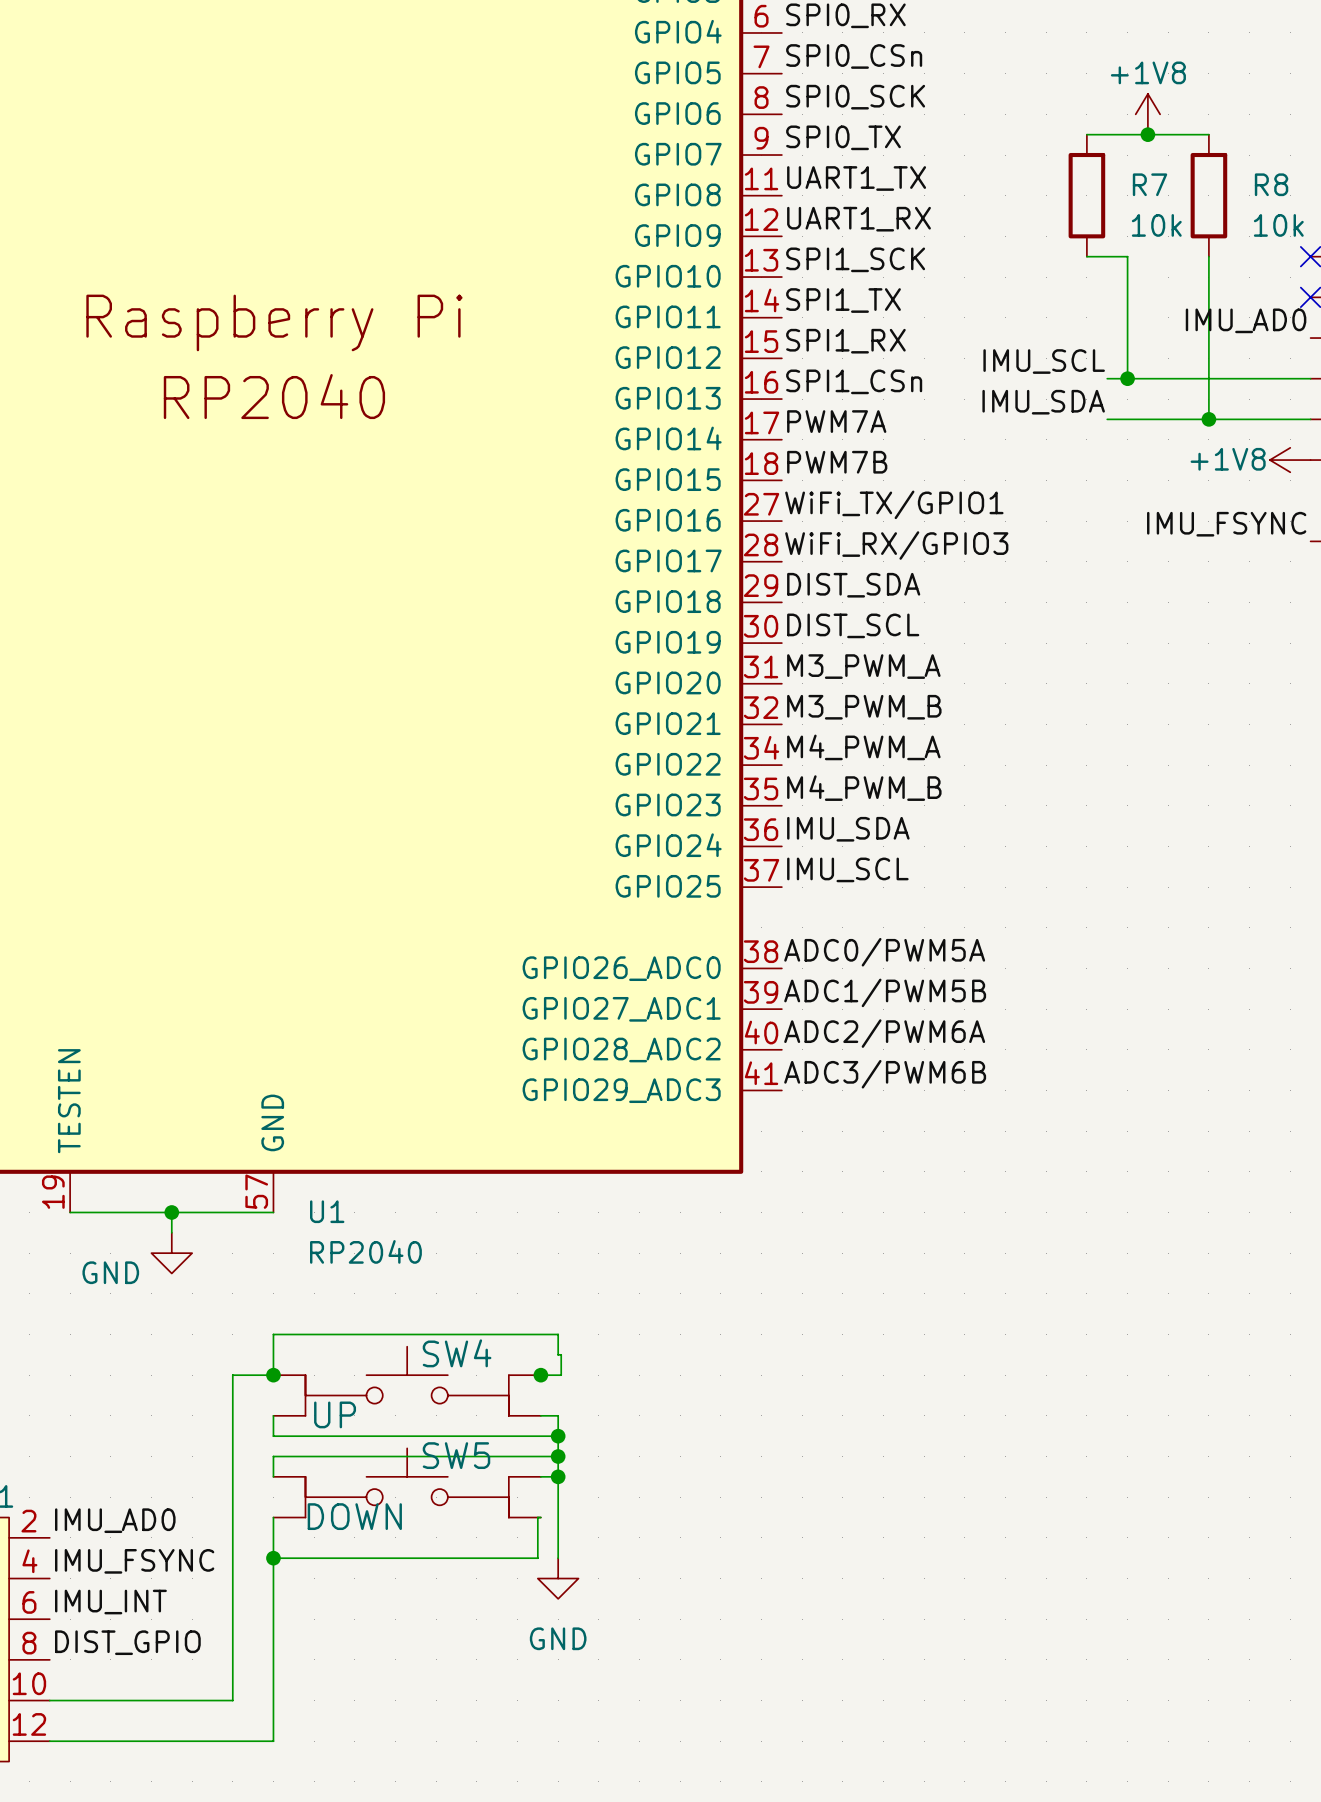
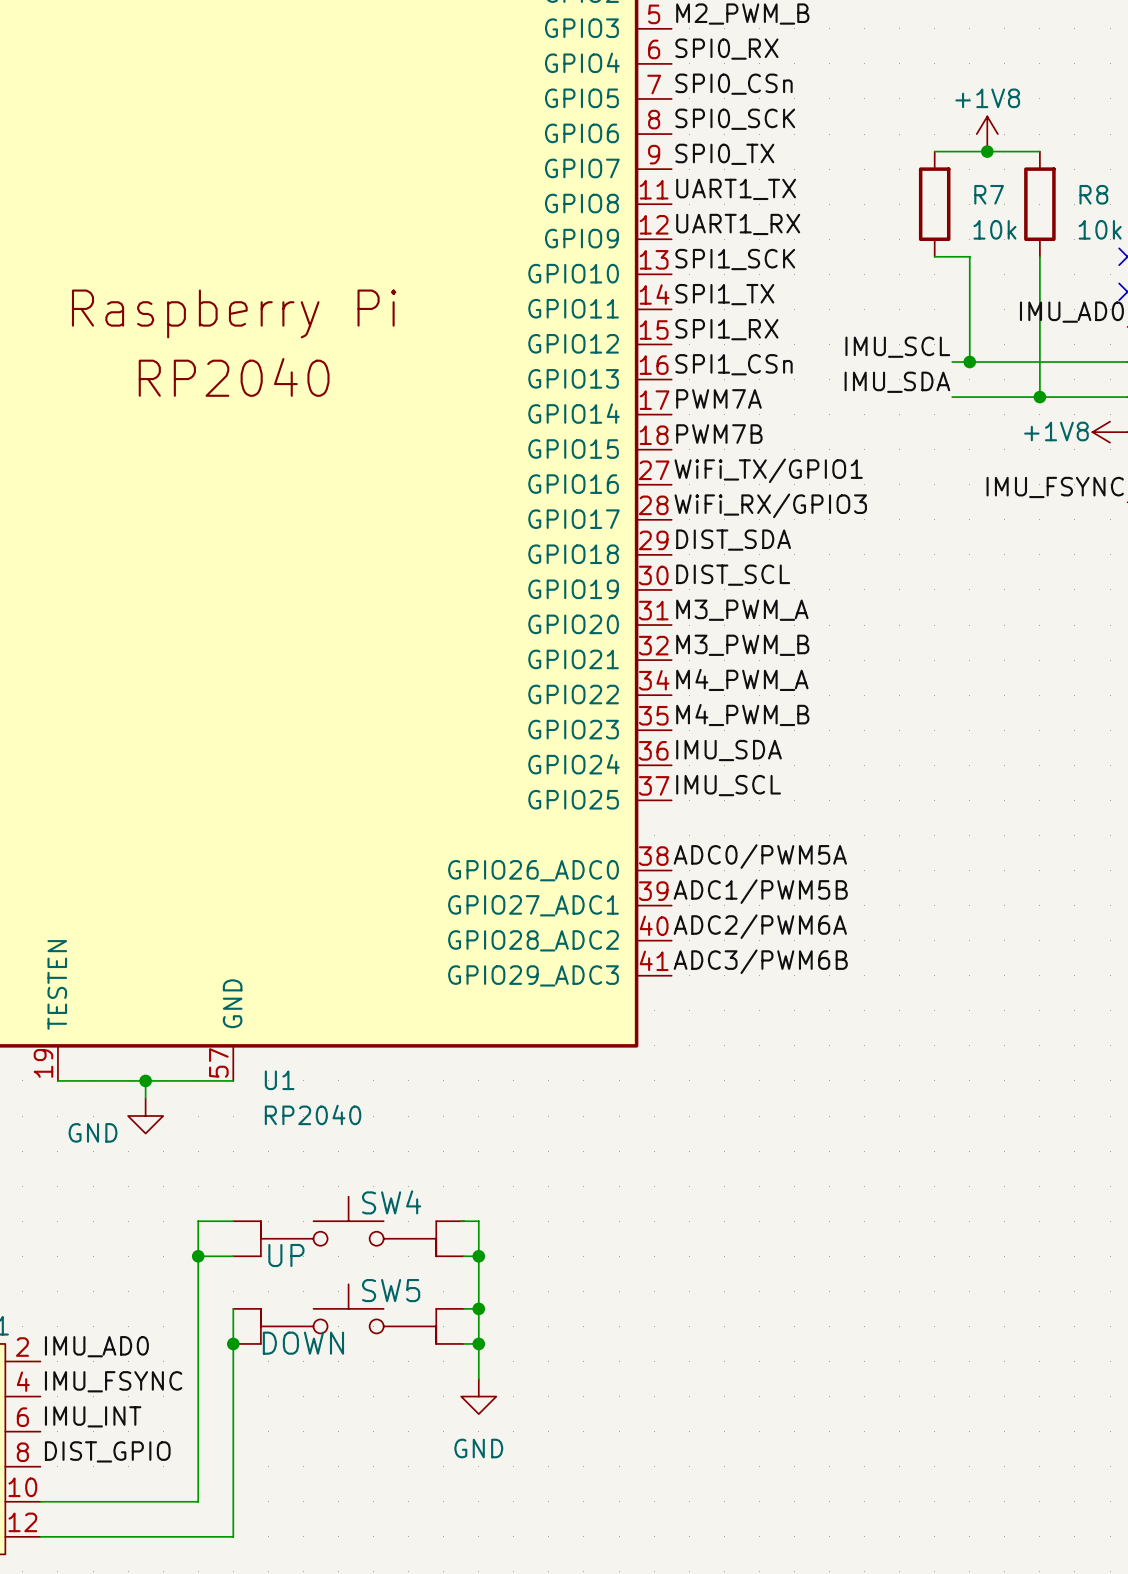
wire: (273, 1375) (273, 1334) (558, 1334) (558, 1354) (561, 1354) (561, 1375) (558, 1375) -> (478, 1256) (478, 1221)
junction position: (273, 1375) -> (198, 1256)
junction: (540, 1375) -> none
wire: (273, 1415) (273, 1436) (558, 1436) -> (233, 1256) (198, 1256)
junction: none -> (478, 1256)
junction: (558, 1436) -> none
wire: (558, 1456) (273, 1456) (273, 1476) -> (233, 1343) (233, 1308)
junction: (558, 1456) -> none
wire: (540, 1517) (537, 1517) (537, 1558) (273, 1558) -> (463, 1343) (478, 1343)
junction: none -> (478, 1343)
junction position: (273, 1558) -> (233, 1343)

